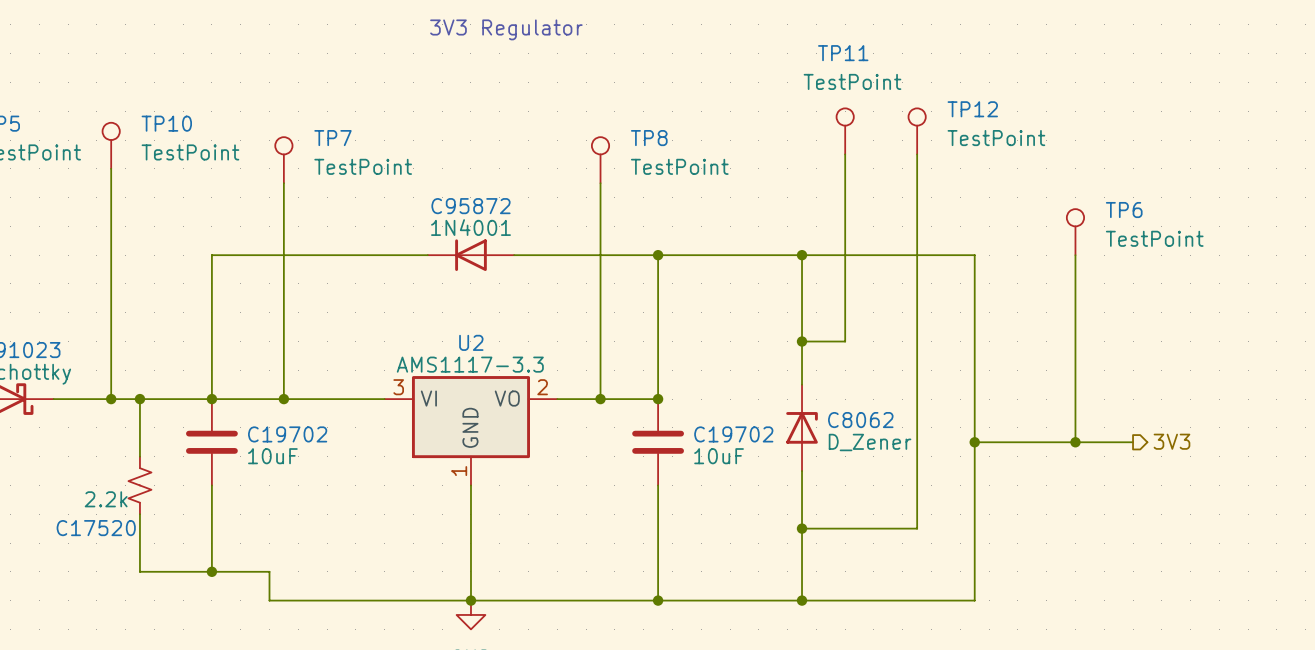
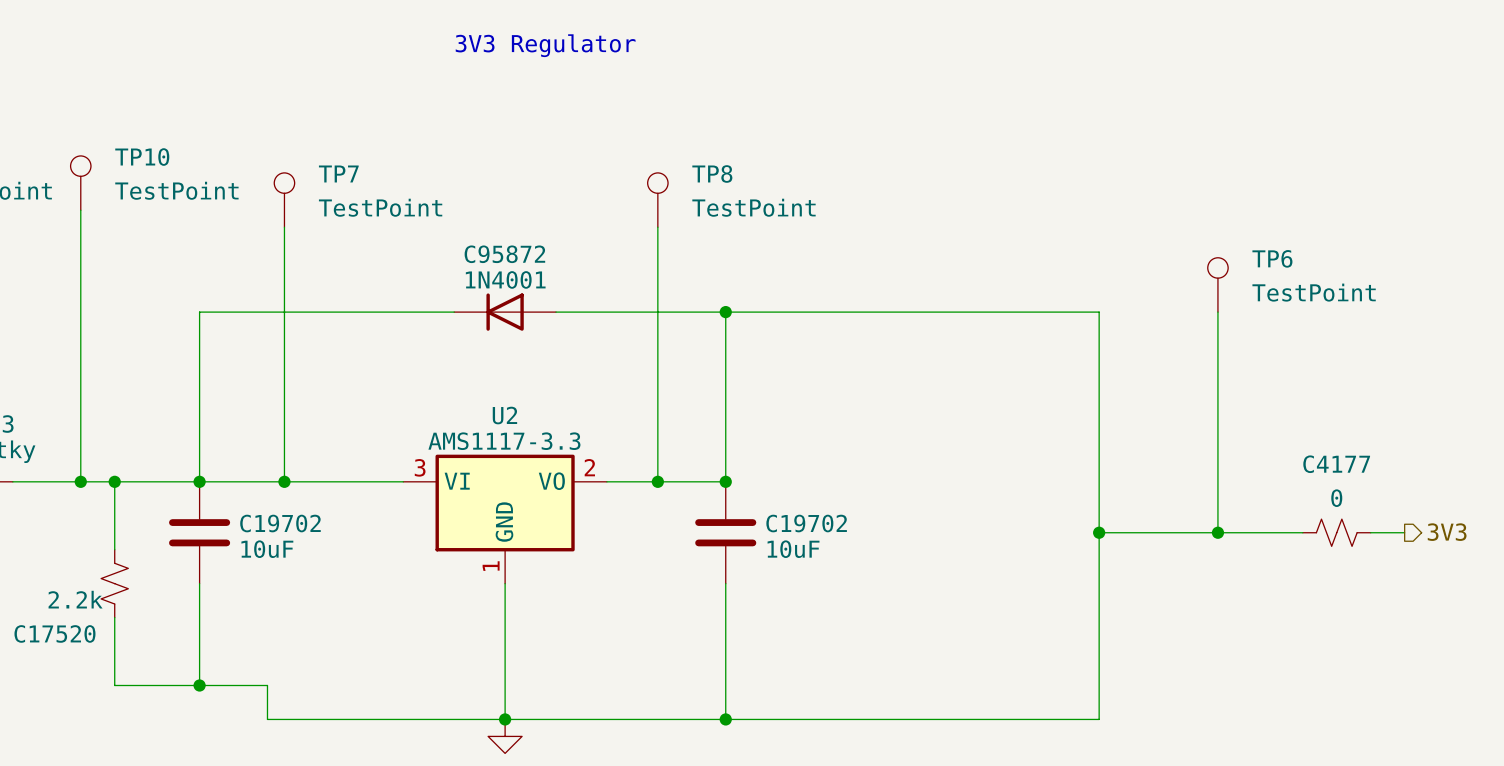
TP11: TestPoint (845, 131) -> none
TP12: TestPoint (917, 131) -> none
wire: (845, 154) (845, 341) (802, 341) -> none
wire: (917, 154) (917, 528) (802, 528) -> none
wire: (802, 255) (802, 384) -> none
junction: (802, 255) -> none
junction: (802, 341) -> none
C8062: D_Zener (802, 427) -> none
hierarchical label position: 3V3 (1171, 441) -> 3V3 (1447, 532)
wire: none -> (1285, 532) (1302, 532)
C4177: none -> 0 (1336, 532)
wire: none -> (1370, 532) (1404, 532)
wire: (802, 471) (802, 600) -> none
junction: (802, 528) -> none
junction: (802, 600) -> none

